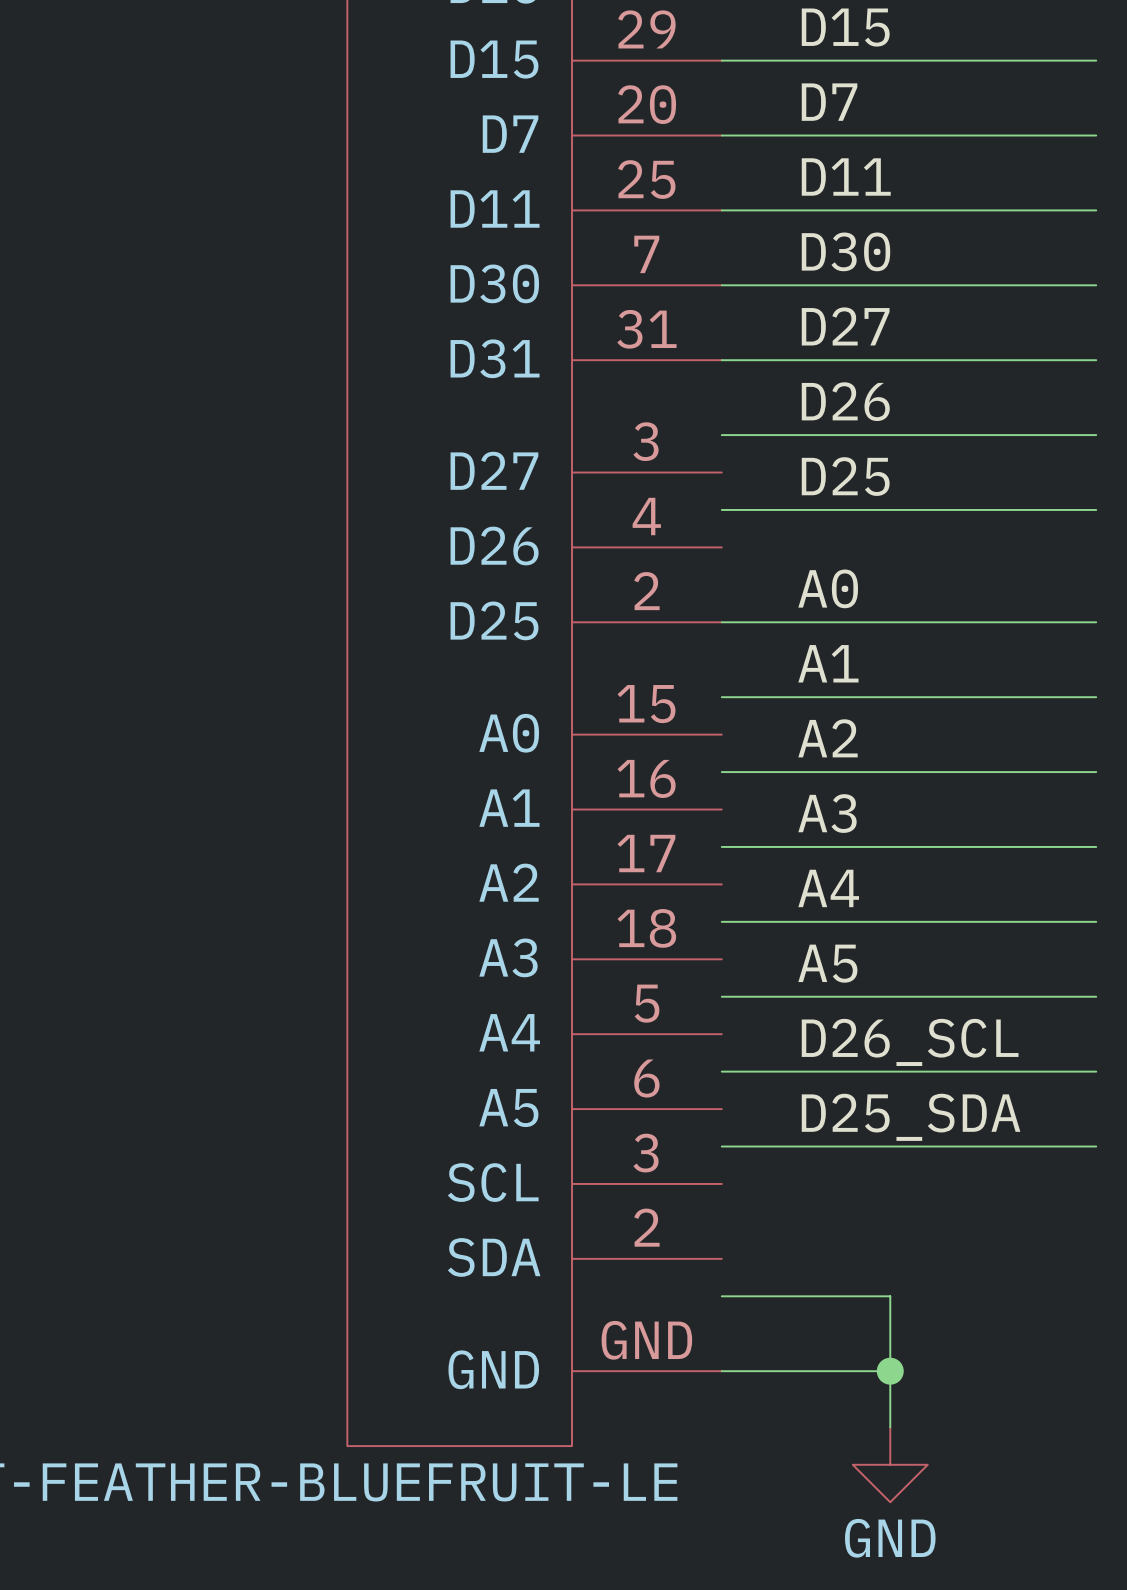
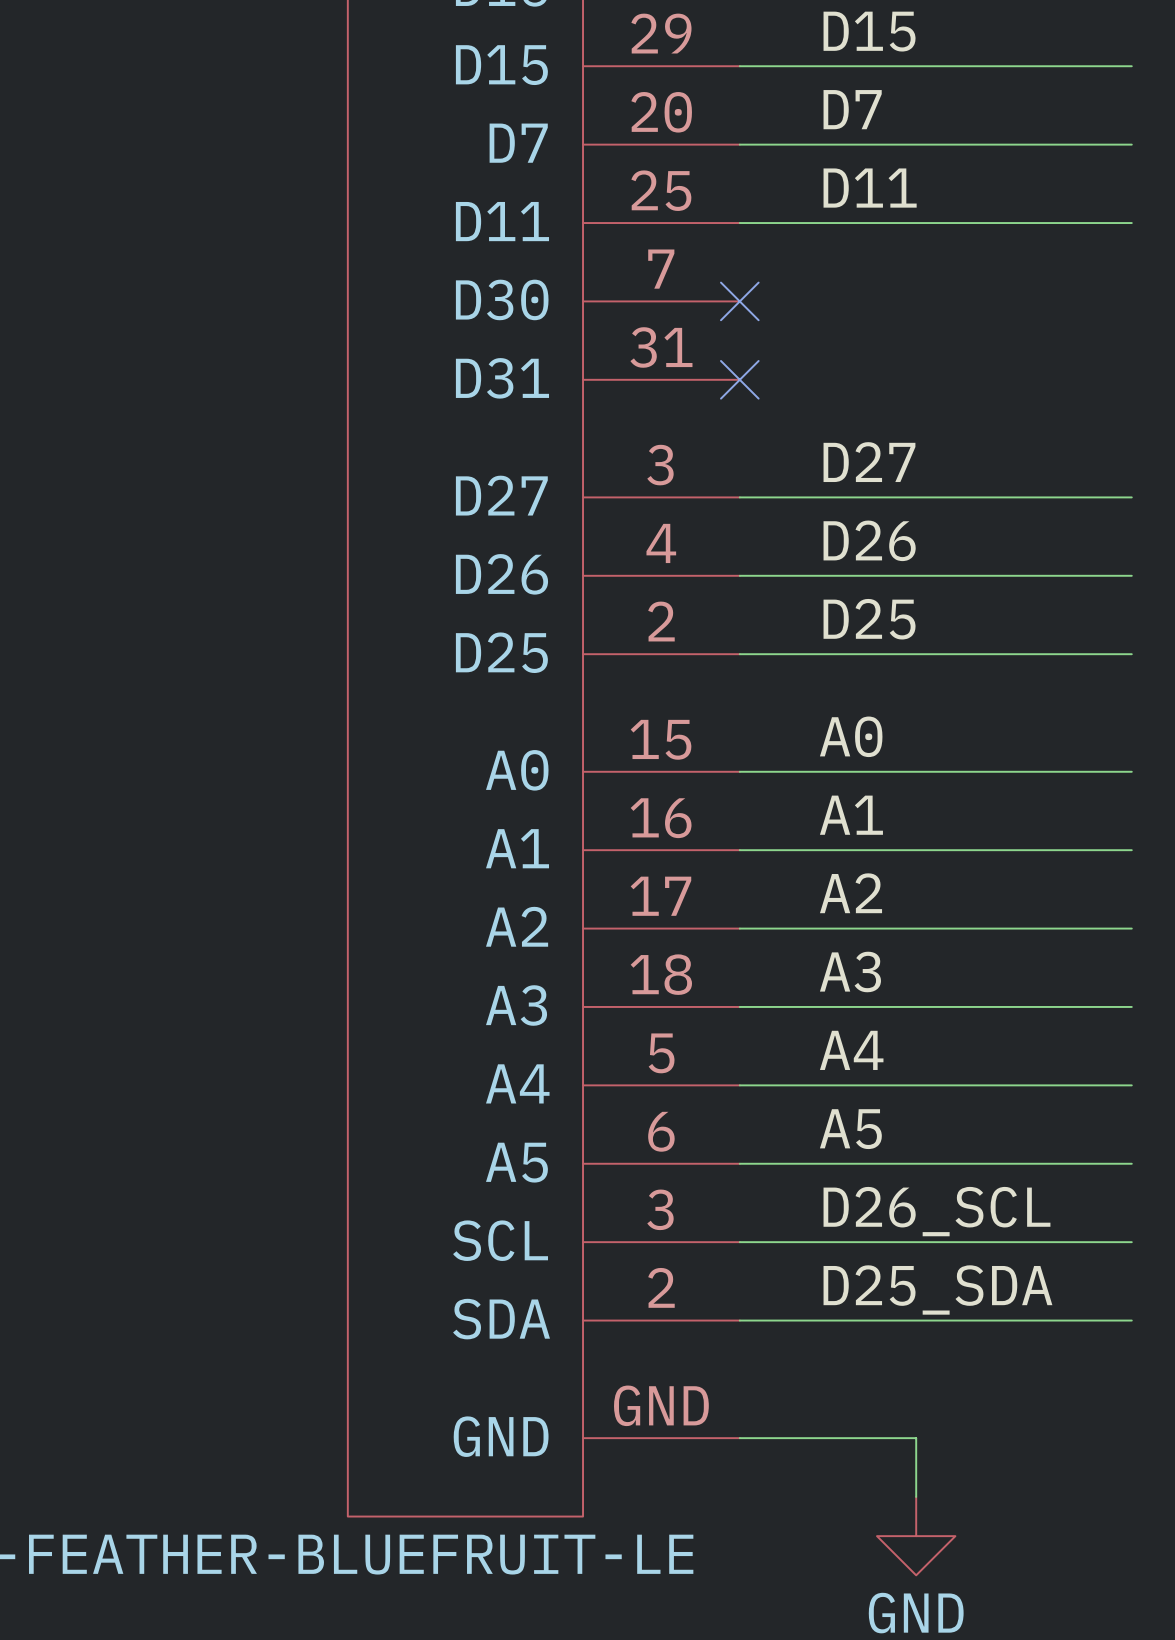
label: D30 (845, 251) -> none
wire: (721, 285) (1096, 285) -> none
no-connect mark: none -> (739, 301)
label position: D27 (845, 326) -> D27 (869, 462)
wire: (721, 360) (1096, 360) -> none
no-connect mark: none -> (739, 379)
label position: D26 (845, 401) -> D26 (869, 540)
wire: (721, 435) (1096, 435) -> (739, 497) (1131, 497)
label: D25 (845, 476) -> none
wire: (721, 509) (1096, 509) -> (739, 575) (1131, 575)
label: A0 (828, 588) -> D25 (869, 619)
label position: A1 (828, 663) -> A1 (851, 815)
wire: (721, 697) (1096, 697) -> (739, 771) (1131, 771)
label: none -> A0 (851, 736)
label position: A2 (827, 738) -> A2 (851, 893)
wire: (721, 772) (1096, 772) -> (739, 850) (1131, 850)
label position: A3 (827, 813) -> A3 (850, 971)
wire: (721, 846) (1096, 846) -> (739, 928) (1131, 928)
label position: A4 (828, 888) -> A4 (851, 1050)
wire: (721, 921) (1096, 921) -> (739, 1006) (1131, 1006)
label position: A5 (827, 963) -> A5 (850, 1129)
wire: (721, 996) (1096, 996) -> (739, 1085) (1131, 1085)
label position: D26_SCL (910, 1042) -> D26_SCL (936, 1211)
wire: (721, 1071) (1096, 1071) -> (739, 1163) (1131, 1163)
label position: D25_SDA (911, 1117) -> D25_SDA (937, 1289)
wire: (721, 1146) (1096, 1146) -> (739, 1242) (1131, 1242)
wire: none -> (739, 1320) (1131, 1320)
wire: (721, 1296) (890, 1296) (890, 1371) -> none
junction: (890, 1371) -> none

